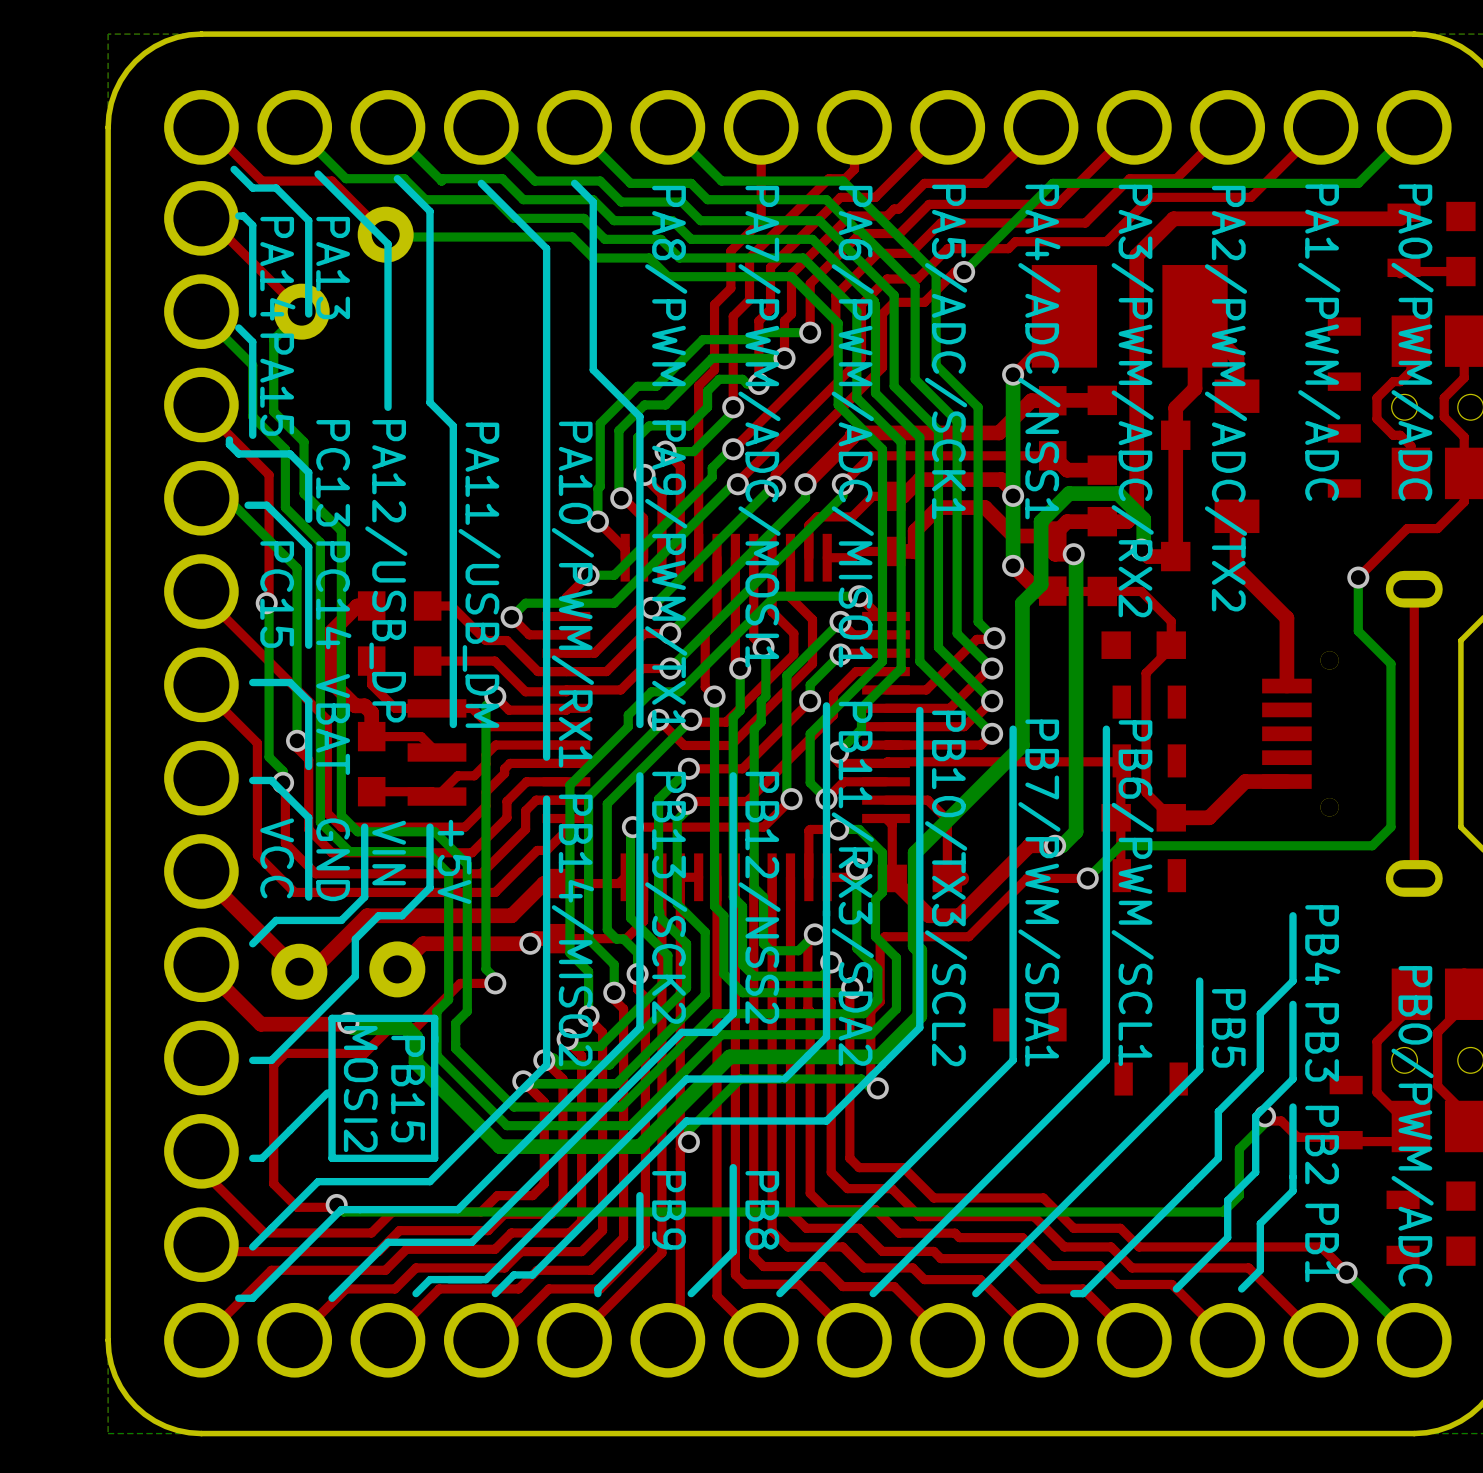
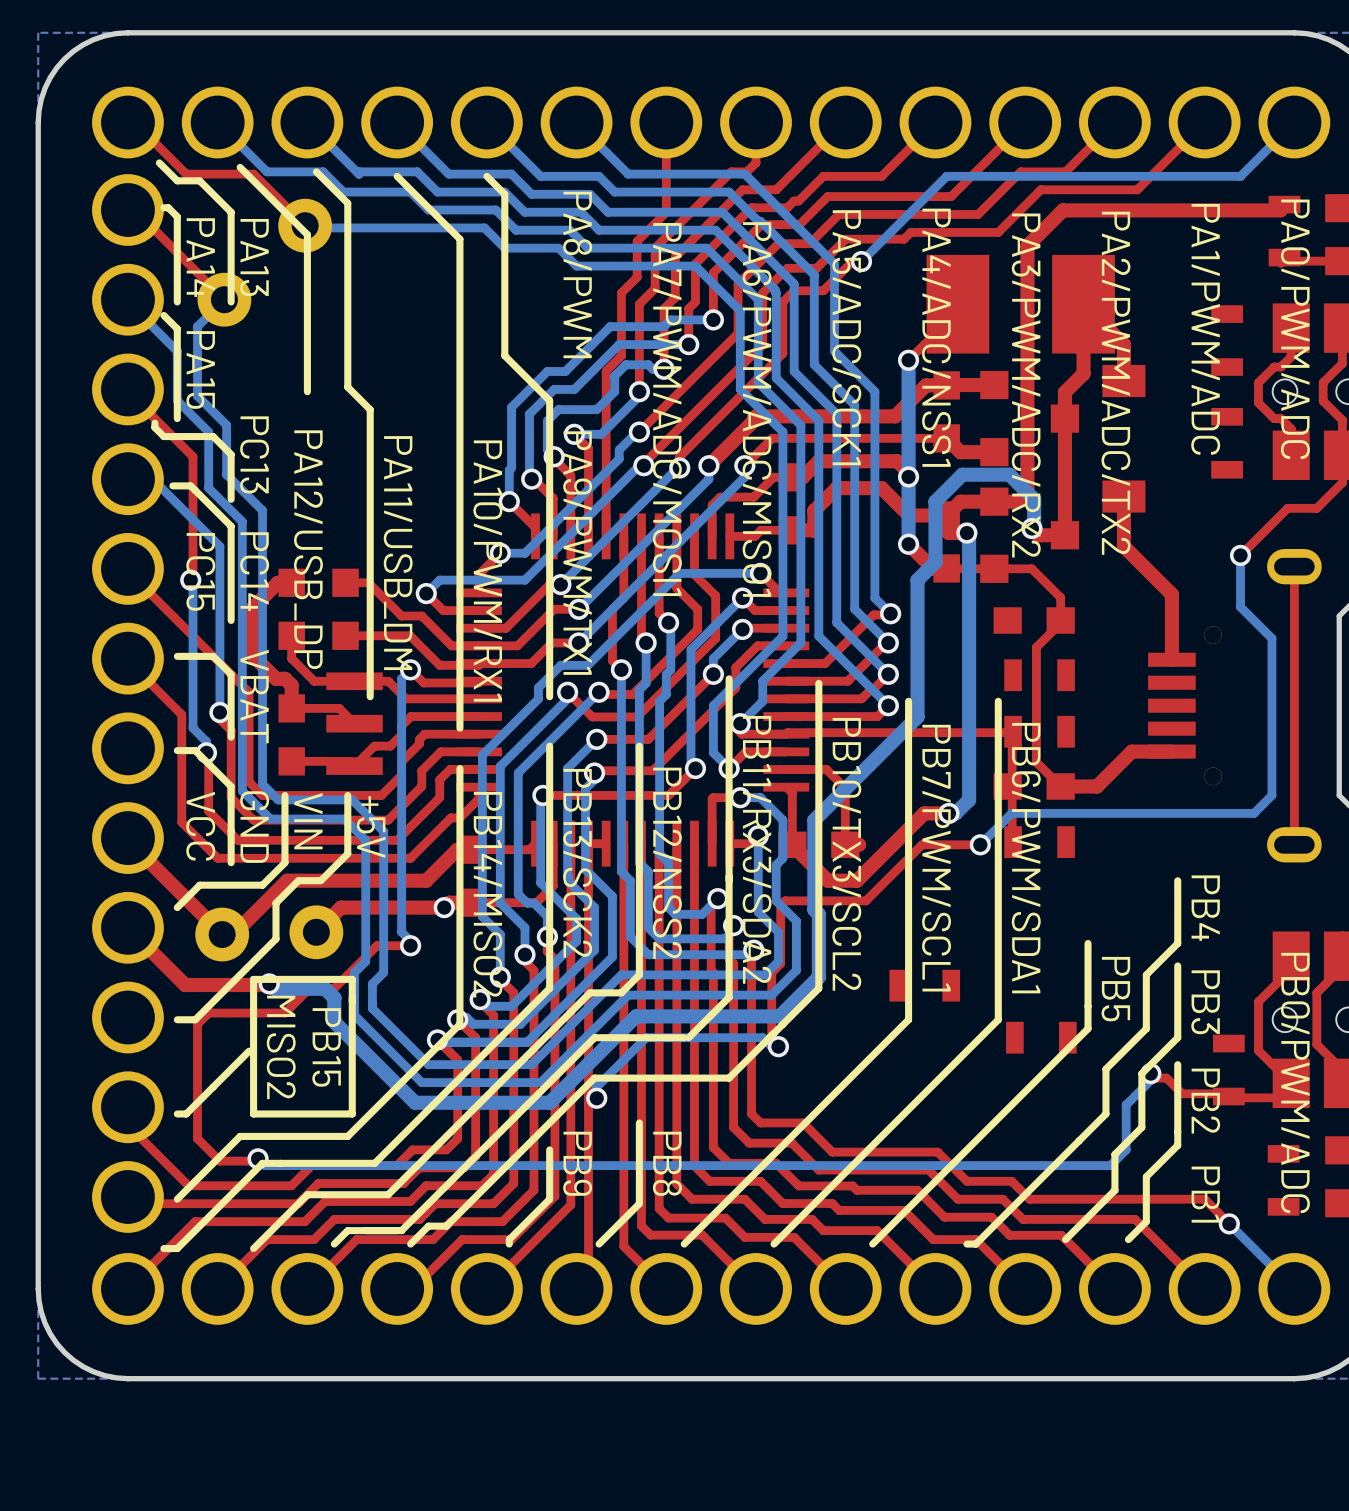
text: PB7/PWM/SDA1 (1039, 893) -> PB7/PWM/SCL1 (936, 858)
text: PB6/PWM/SCL1 (1132, 893) -> PB6/PWM/SDA1 (1026, 858)
text: MOSI2 (360, 1089) -> MISO2 (281, 1047)

